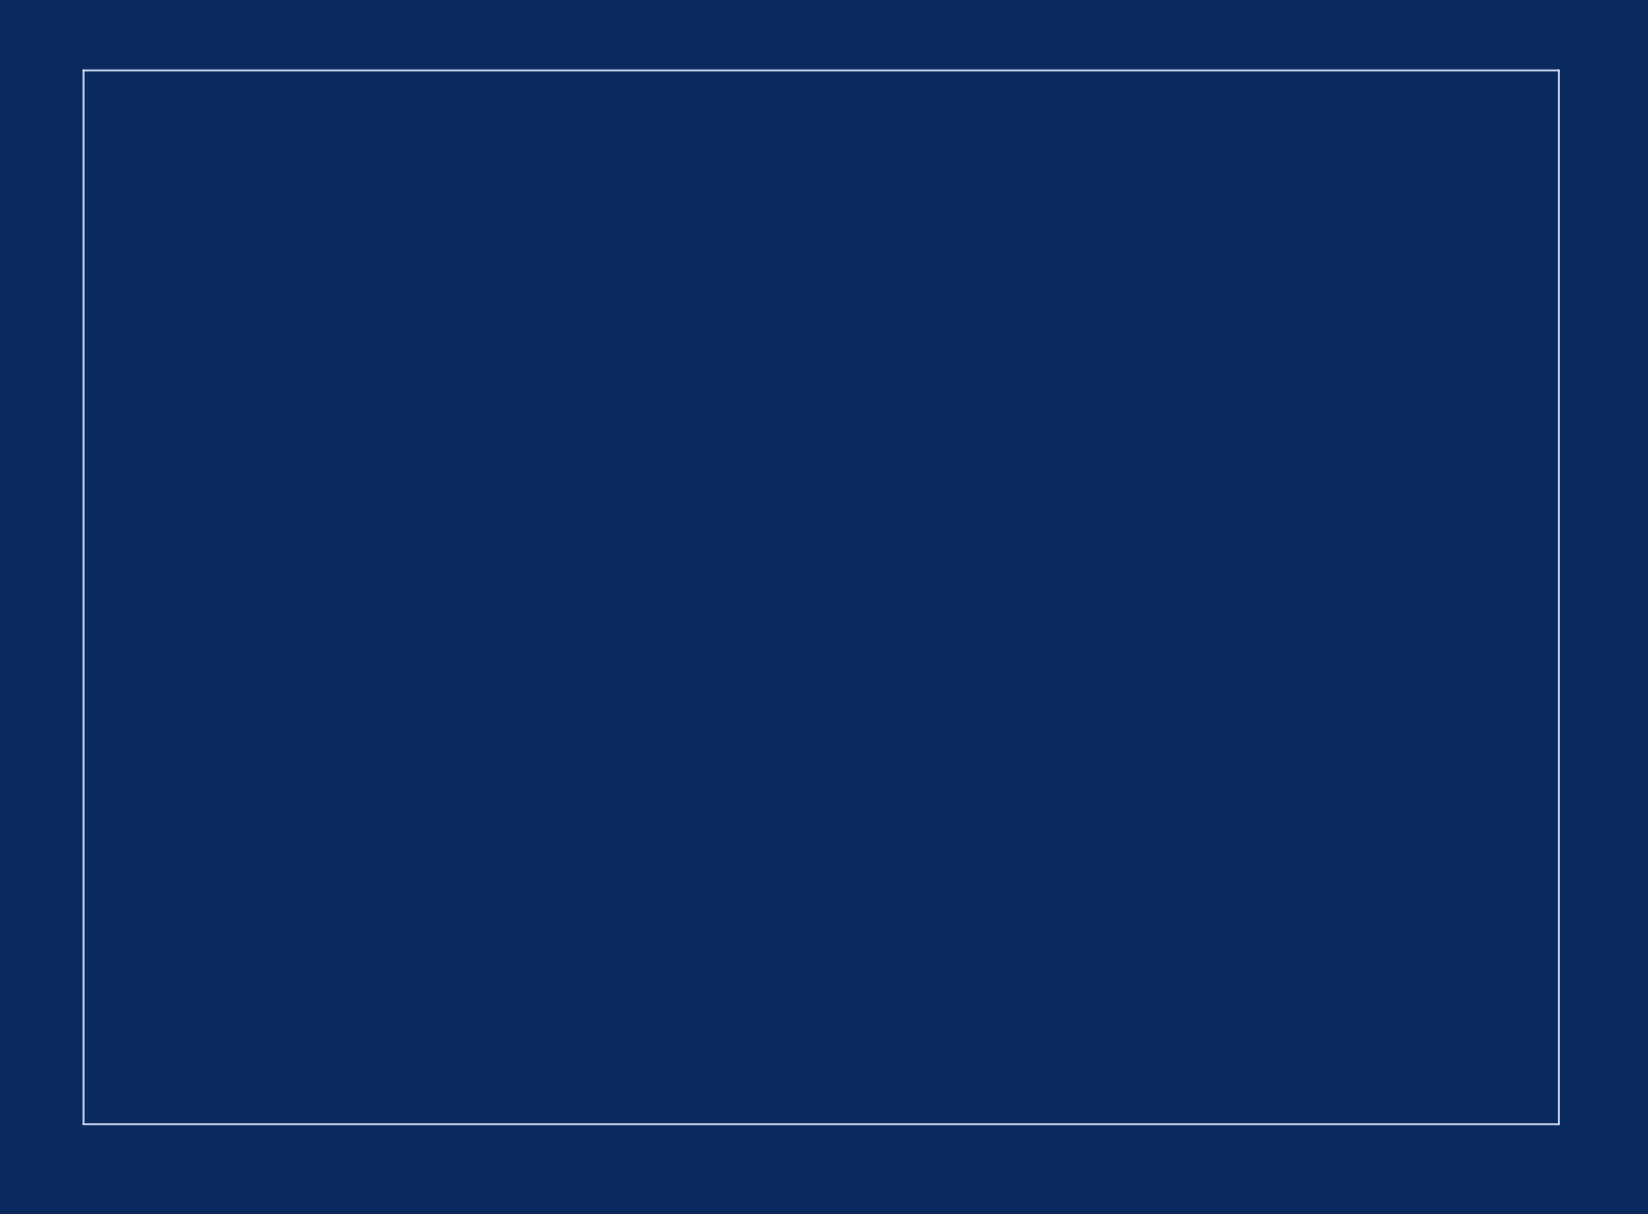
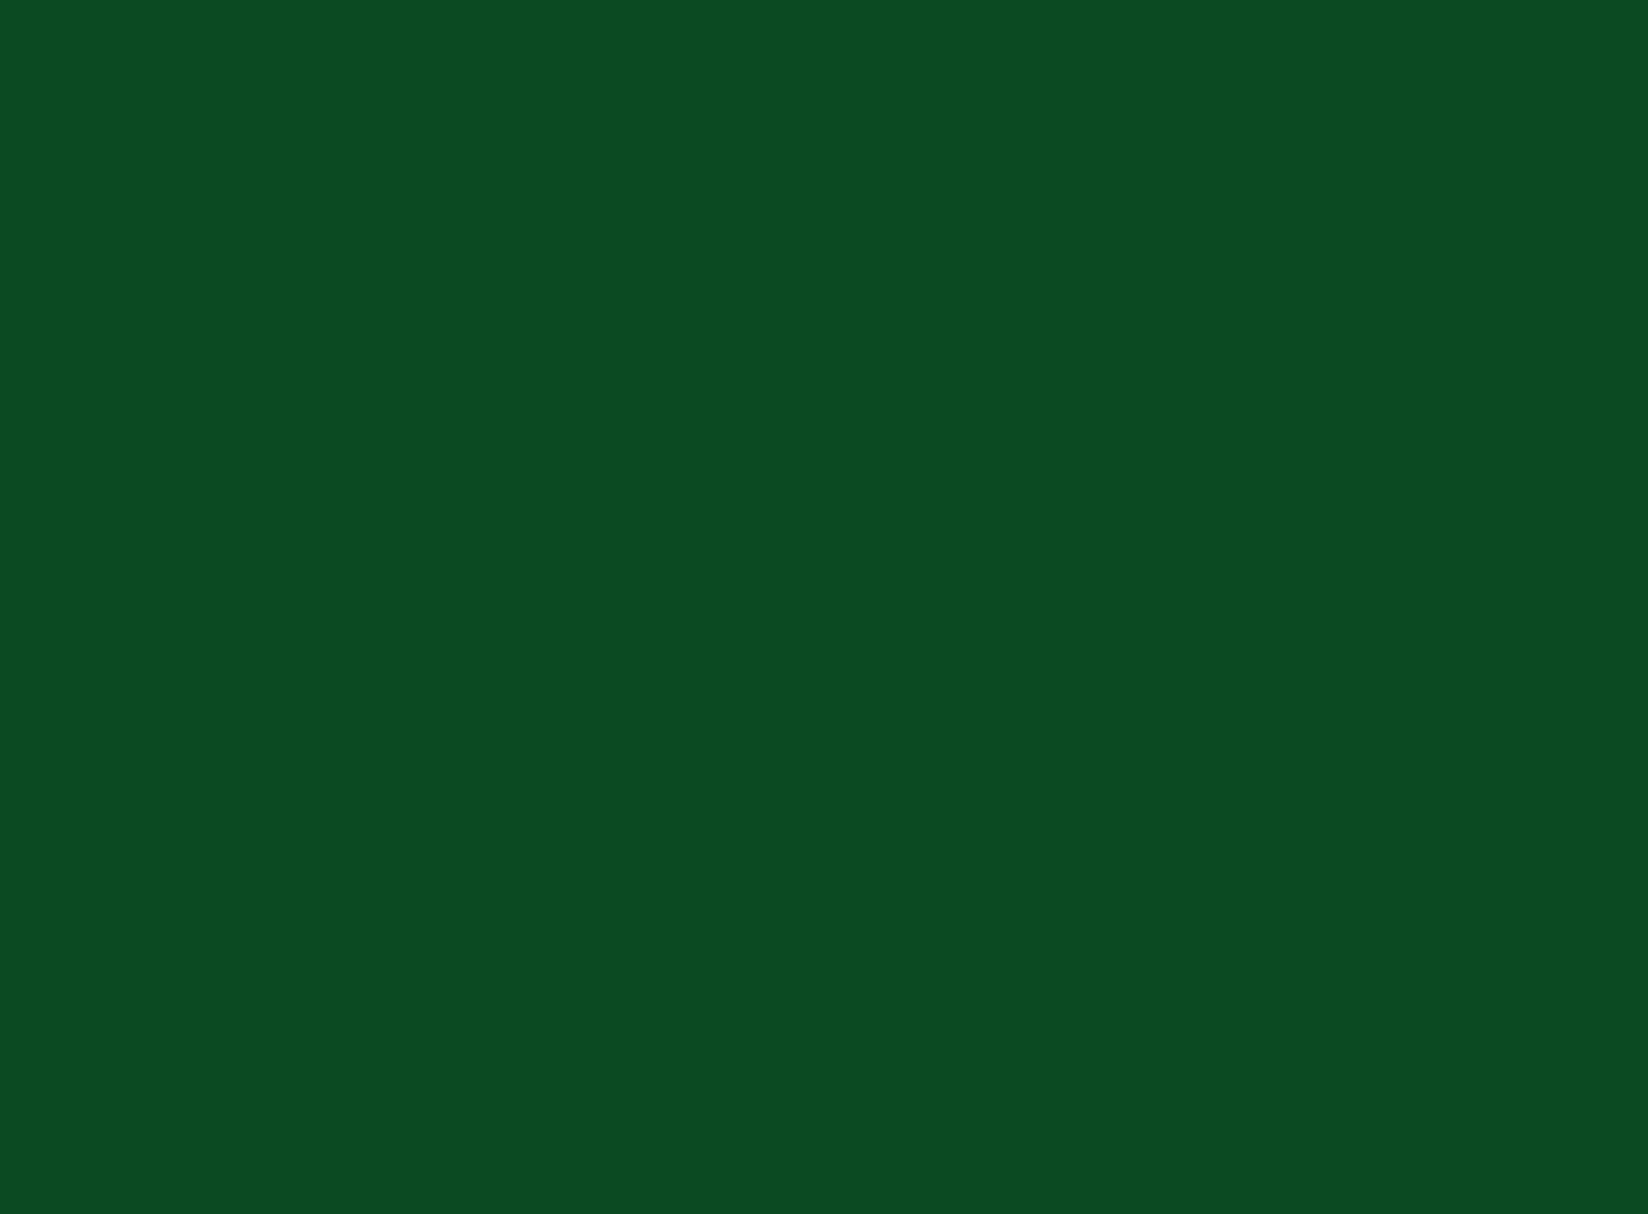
board edge: (83, 70) (83, 1124) (1558, 1124) (1558, 70) (83, 70) -> none

